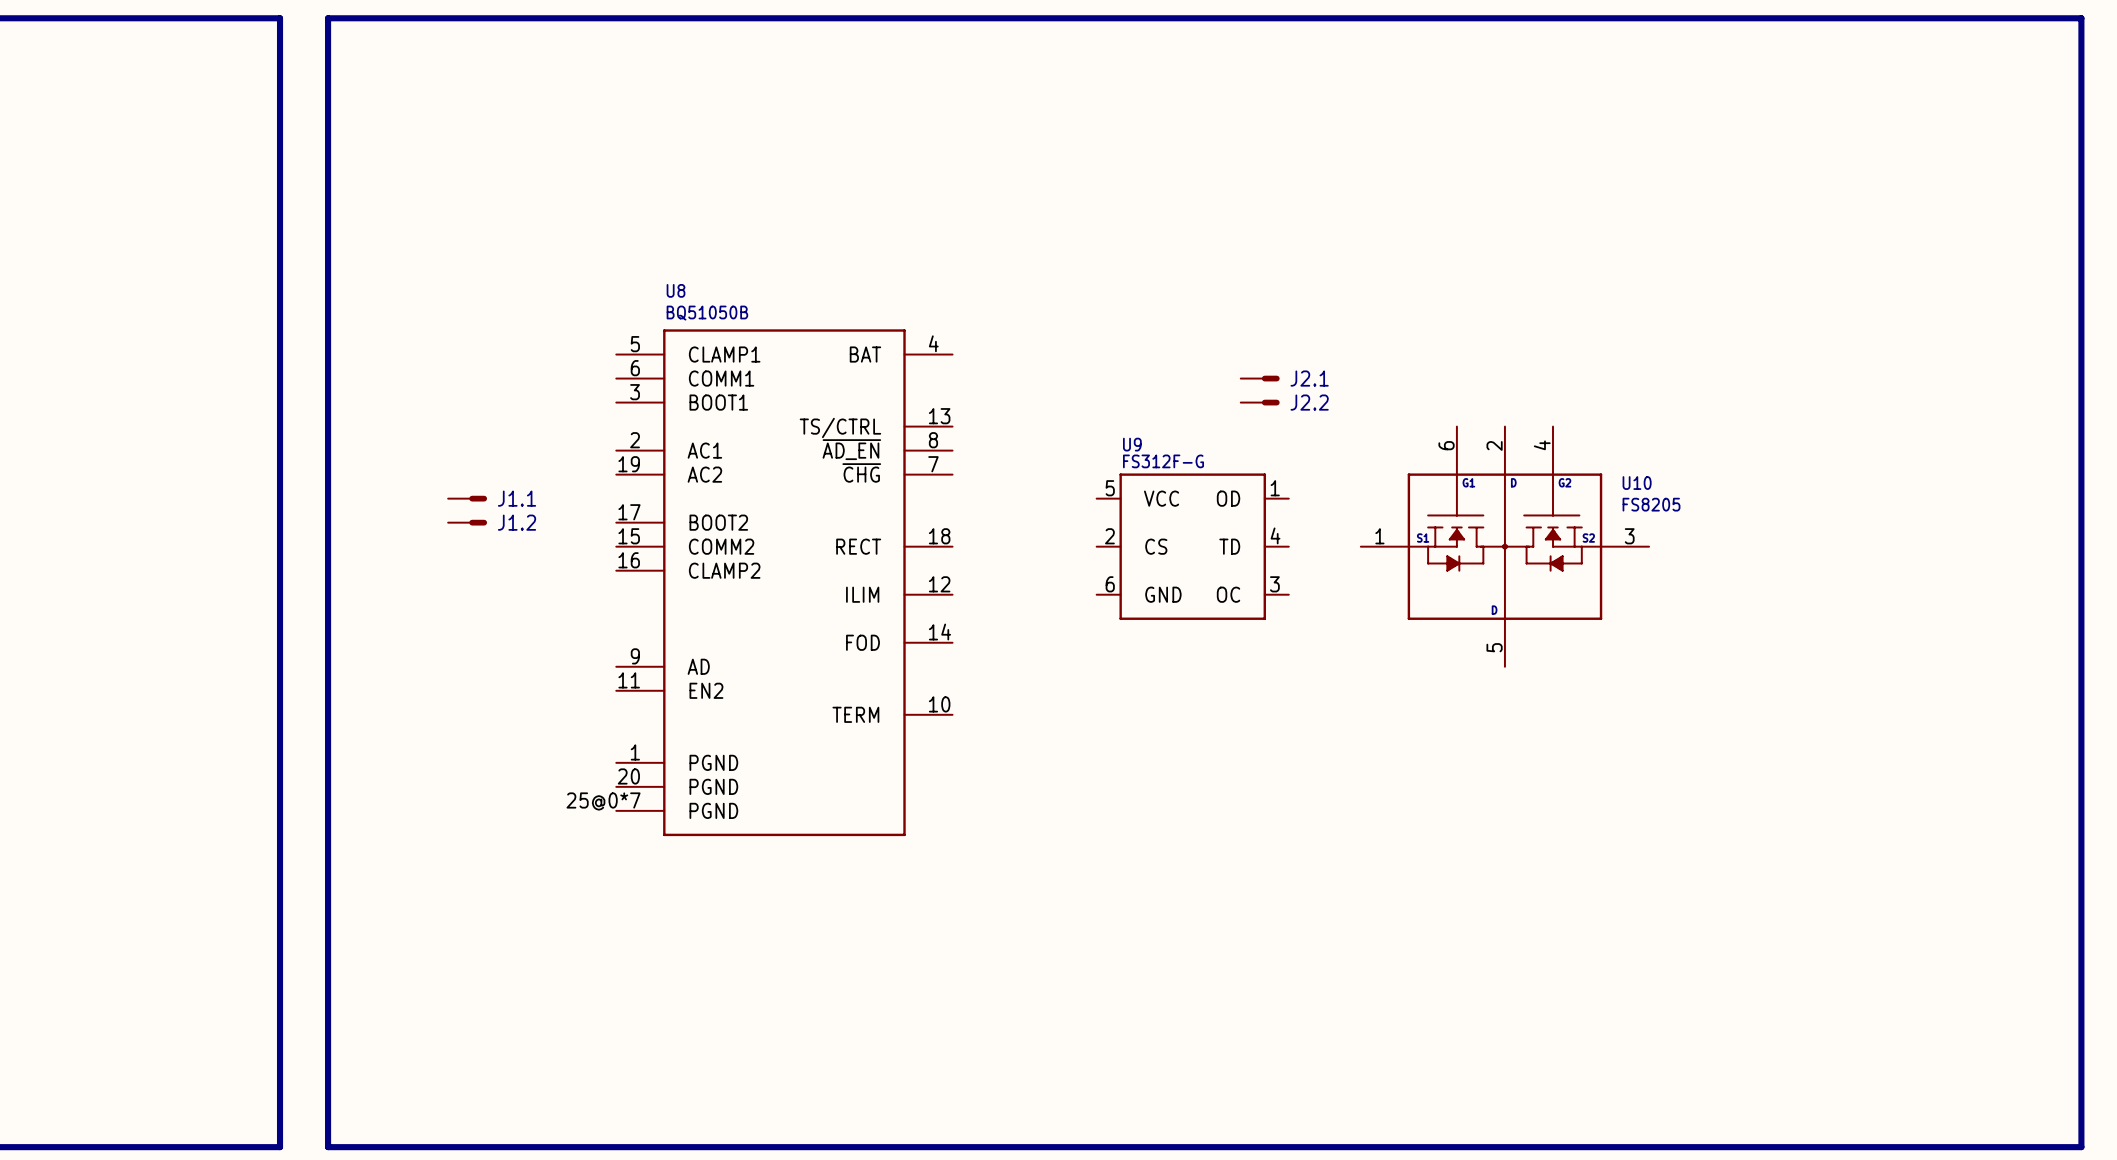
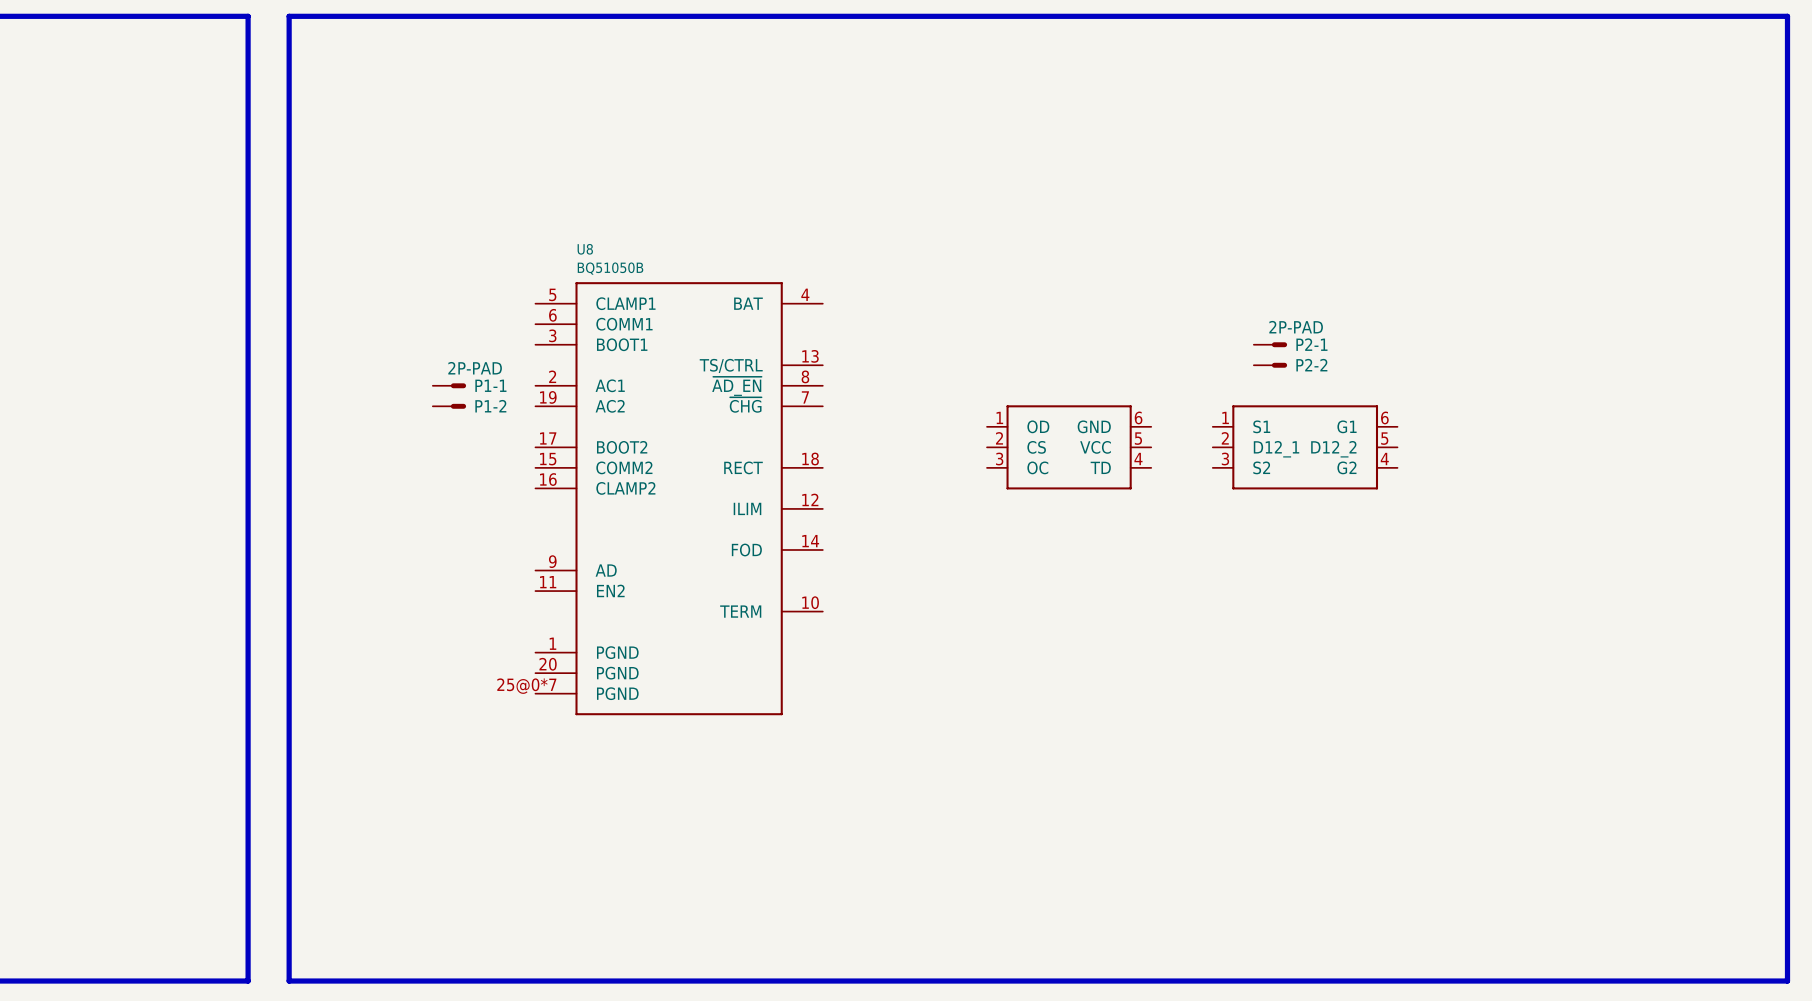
J2.1: (1260, 378) -> none
J2.2: (1260, 402) -> none
P2-1: none -> 2P-PAD (1270, 344)
P2-2: none -> (1270, 365)
P1-1: none -> 2P-PAD (449, 385)
P1-2: none -> (449, 406)
J1.1: (467, 498) -> none
J1.2: (467, 522) -> none
part: none -> (1069, 447)
part: none -> (1305, 447)
U9: FS312F-G (1192, 546) -> none
U10: FS8205 (1504, 546) -> none

